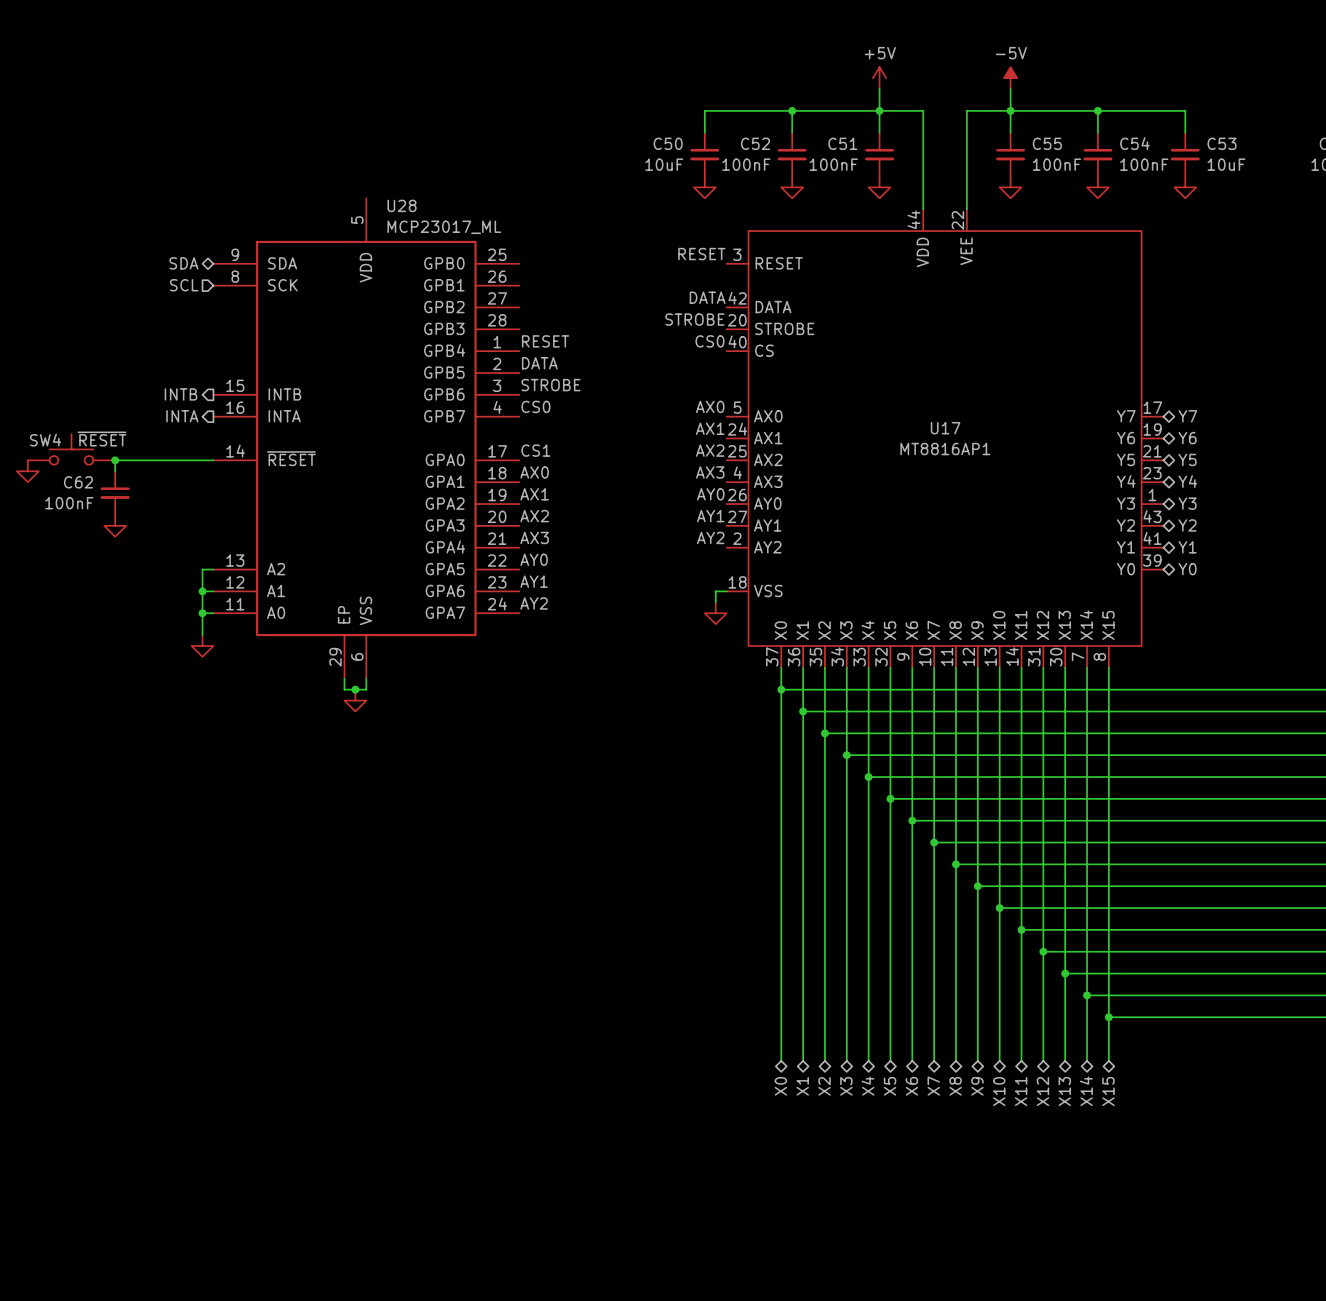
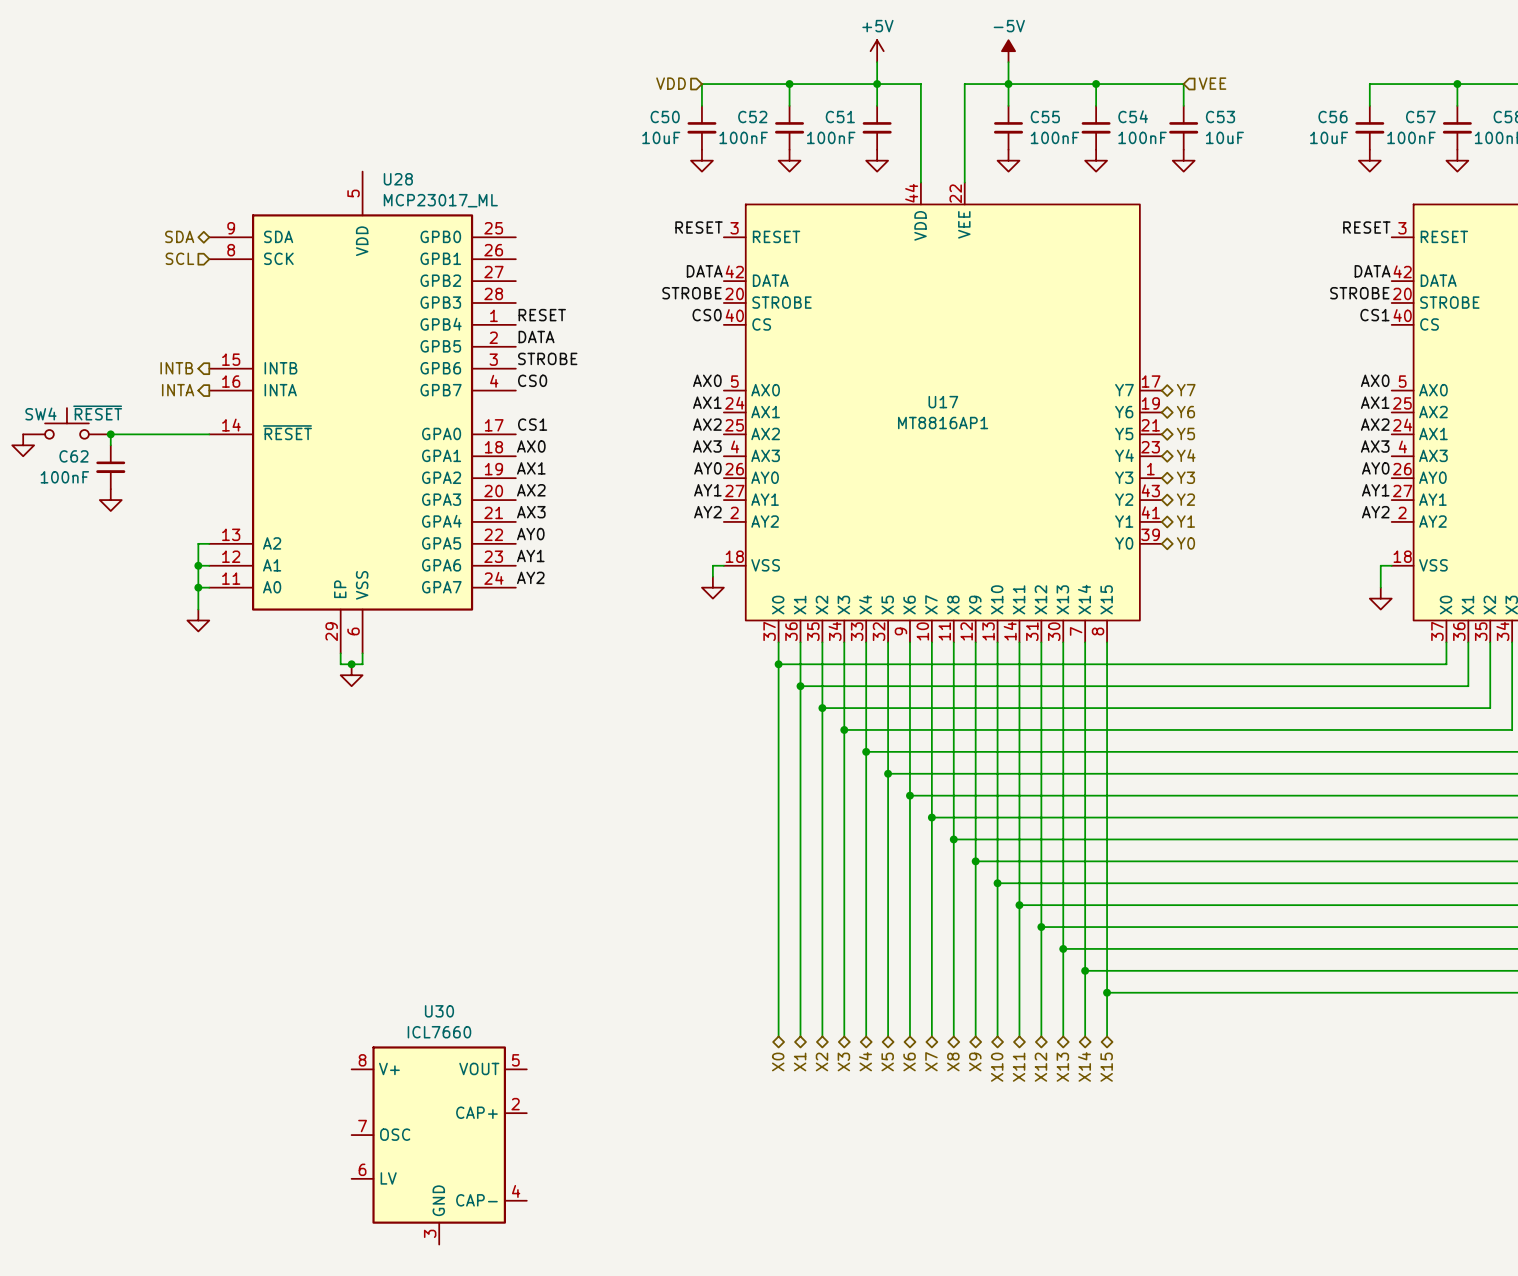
hierarchical label: none -> VDD (671, 83)
hierarchical label: none -> VEE (1212, 83)
U30: none -> ICL7660 (439, 1145)

